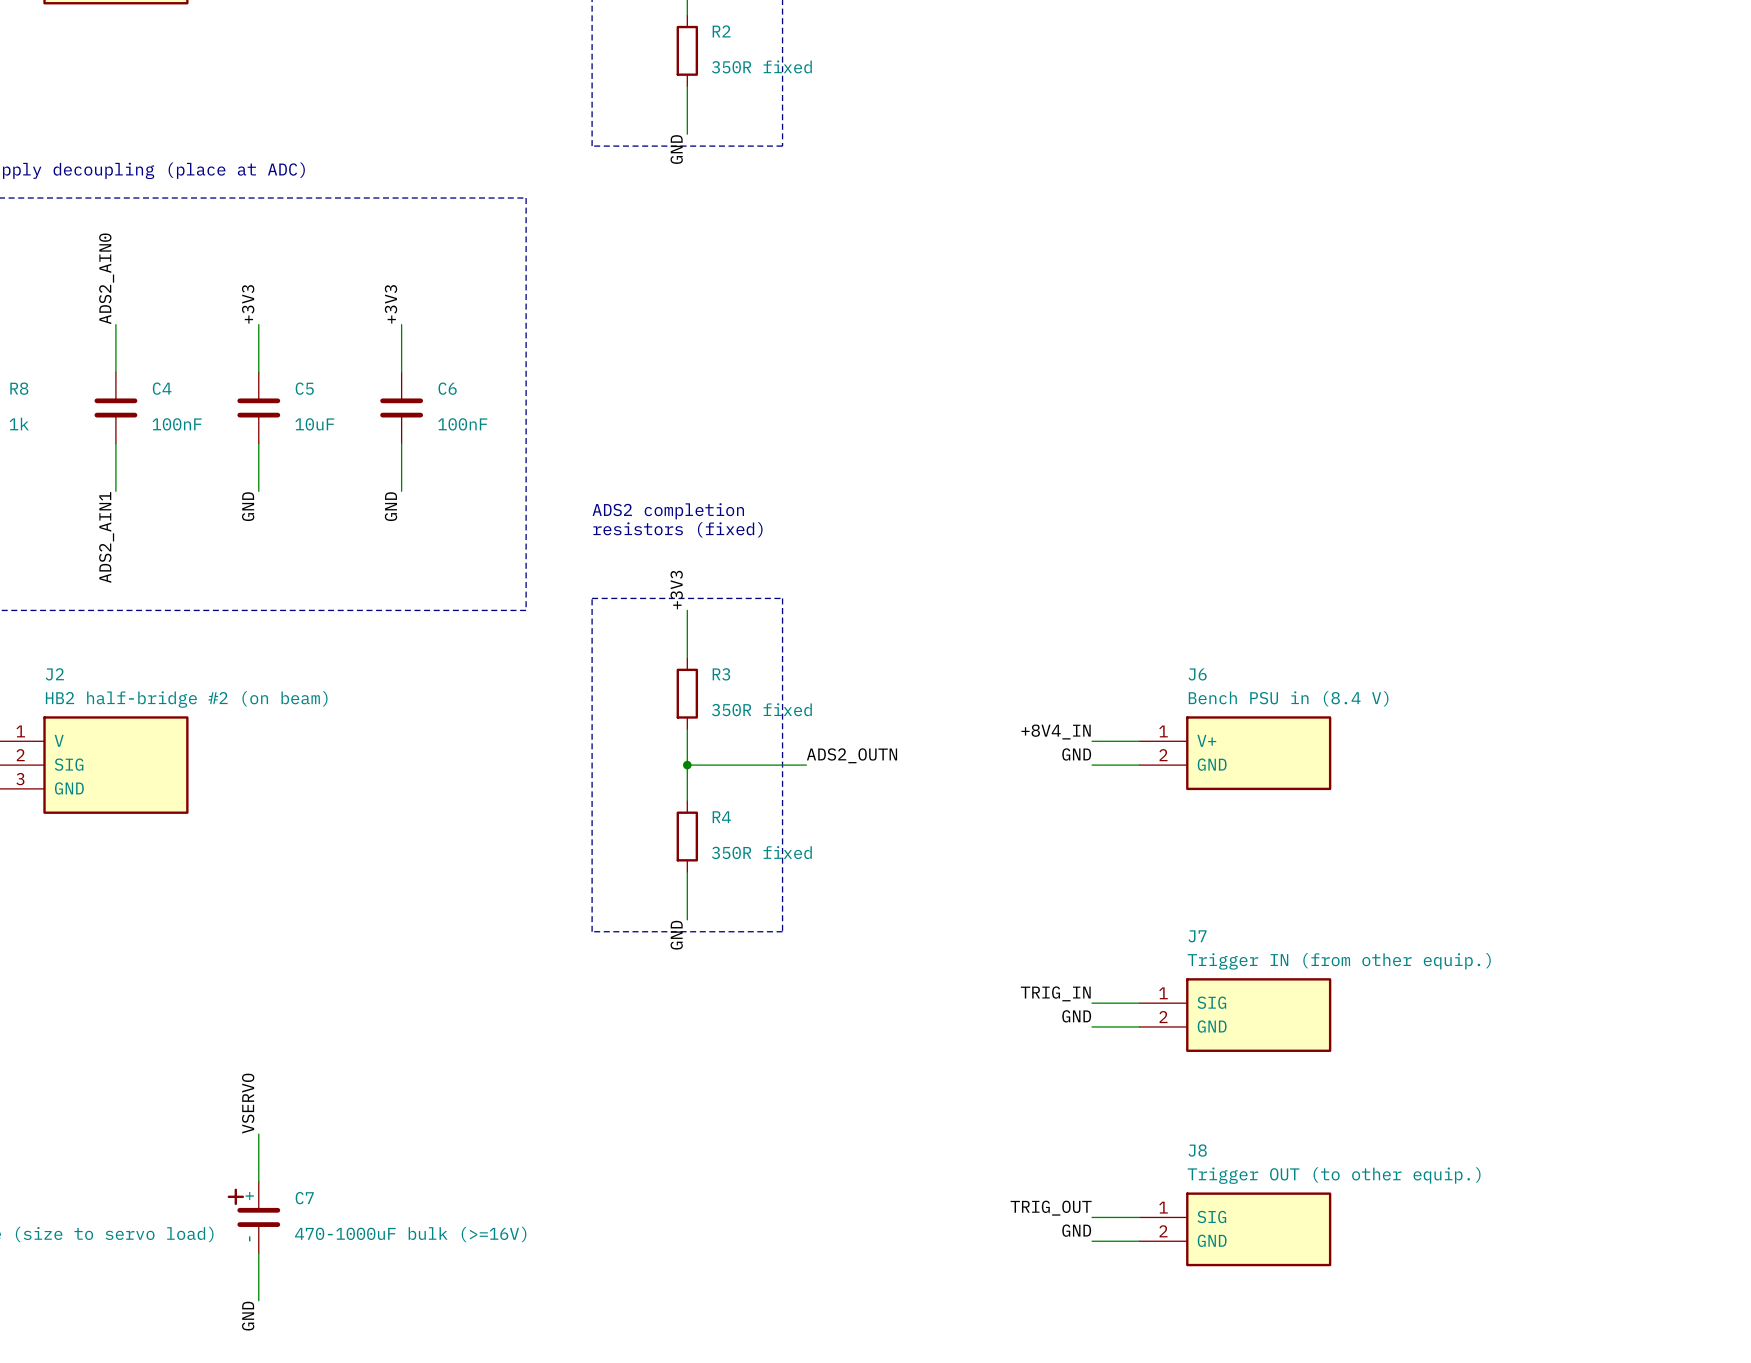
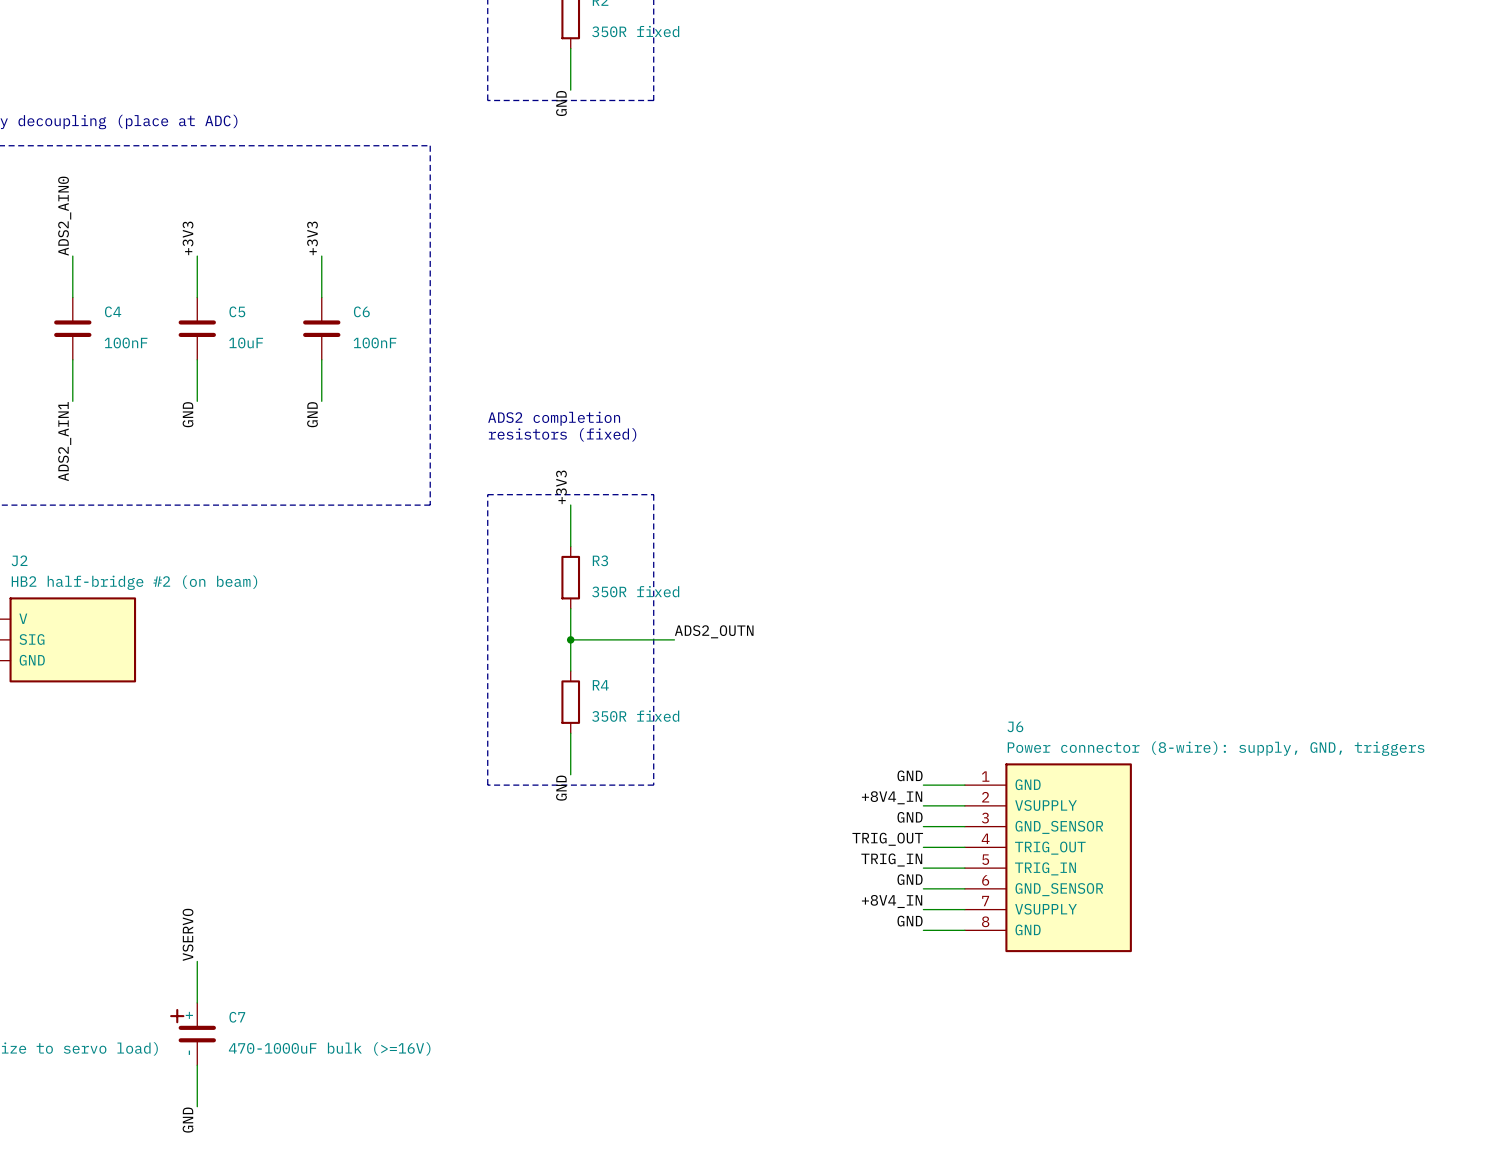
J6 name position: J6 (1197, 674) -> J6 (1015, 726)
J6 value: Bench PSU in (8.4 V) (1288, 698) -> Power connector (8-wire): supply, GND, triggers (1216, 748)
J6 symbol: [1139, 716, 1332, 791] -> [964, 763, 1132, 953]
label: +8V4_IN (1056, 732) -> none
wire: (1092, 741) (1139, 741) -> (923, 785) (964, 785)
label: GND (1076, 754) -> none
wire: (1092, 765) (1139, 765) -> (923, 805) (964, 805)
label: none -> GND (910, 775)
label: none -> +8V4_IN (892, 797)
label: none -> GND (910, 817)
wire: none -> (923, 826) (964, 826)
label: TRIG_IN (1055, 993) -> TRIG_OUT (887, 839)
J7: Trigger IN (from other equip.) (1235, 1015) -> none
label: GND (1076, 1016) -> TRIG_IN (891, 860)
label: none -> GND (910, 879)
wire: none -> (923, 888) (964, 888)
label: none -> +8V4_IN (892, 901)
label: none -> GND (910, 921)
label: TRIG_OUT (1051, 1208) -> none
wire: (1092, 1217) (1139, 1217) -> (923, 909) (964, 909)
J8: Trigger OUT (to other equip.) (1235, 1229) -> none
label: GND (1076, 1230) -> none
wire: (1092, 1241) (1139, 1241) -> (923, 930) (964, 930)

